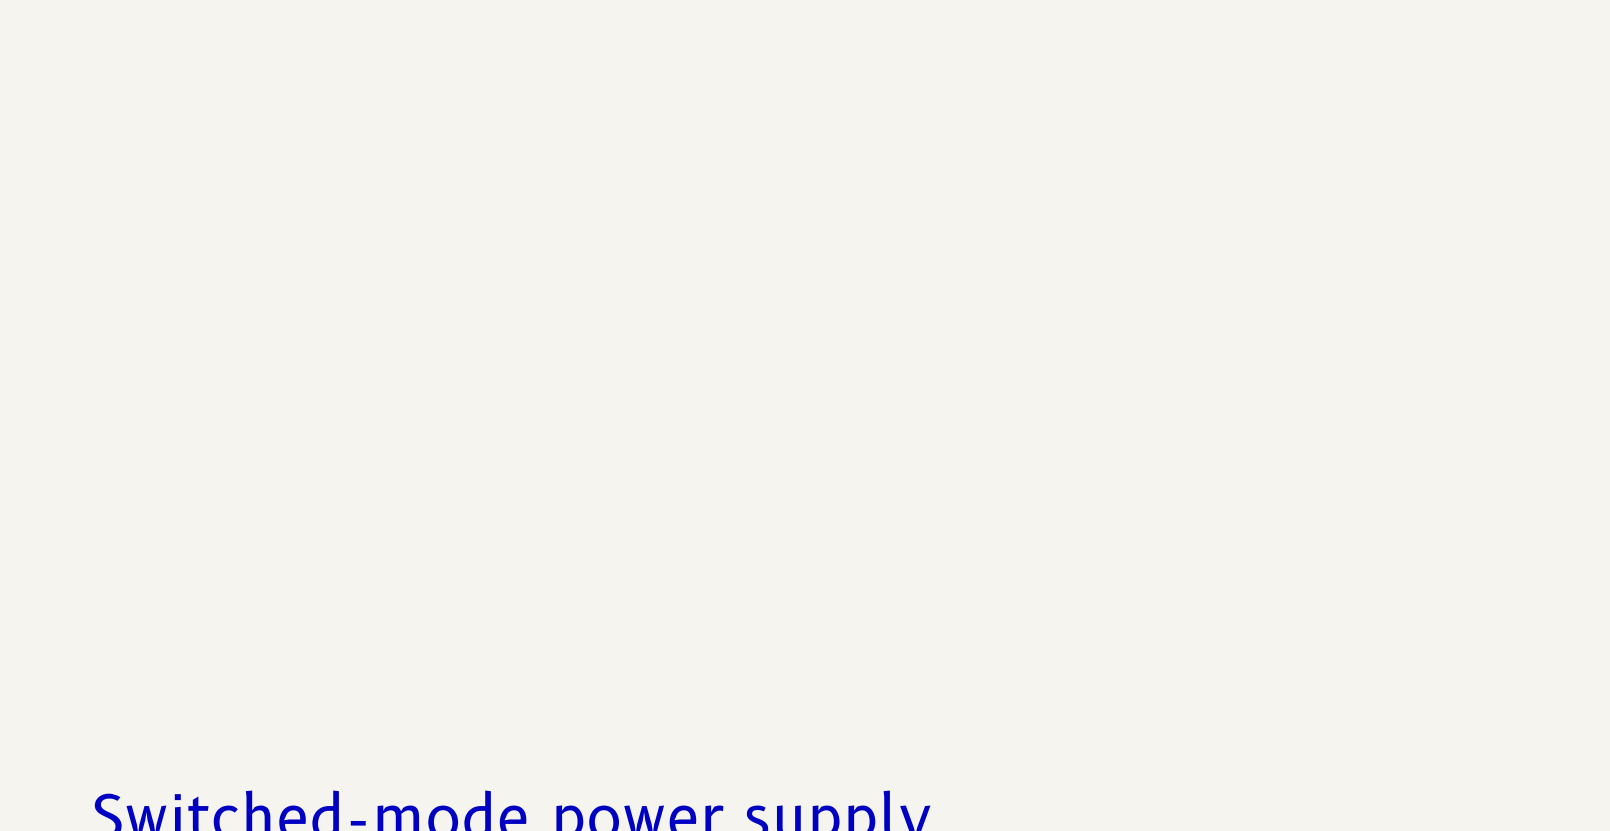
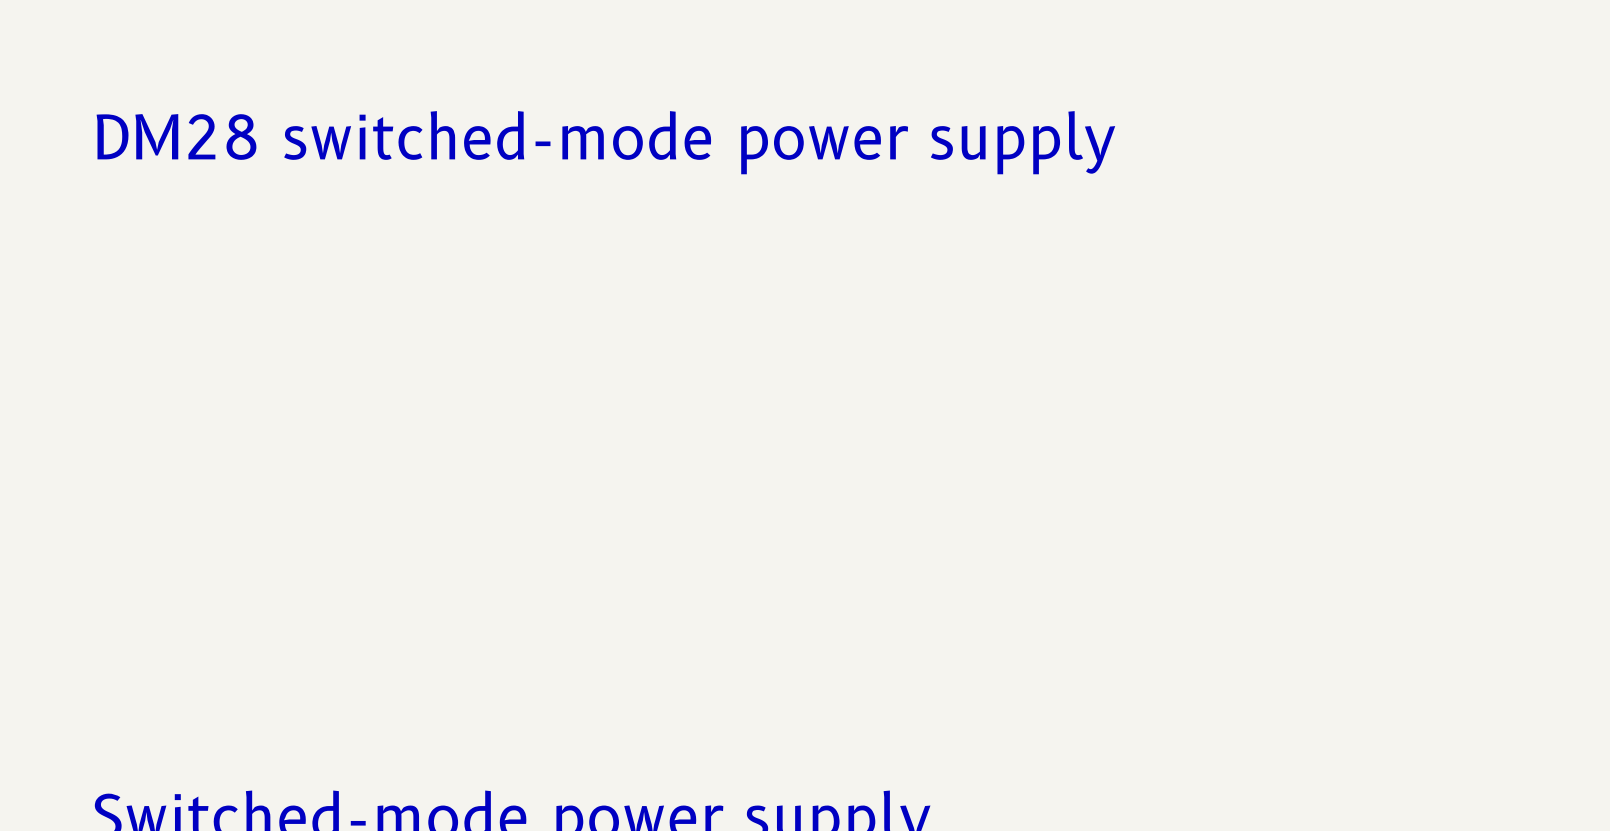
text: none -> DM28 switched-mode power supply (605, 142)

